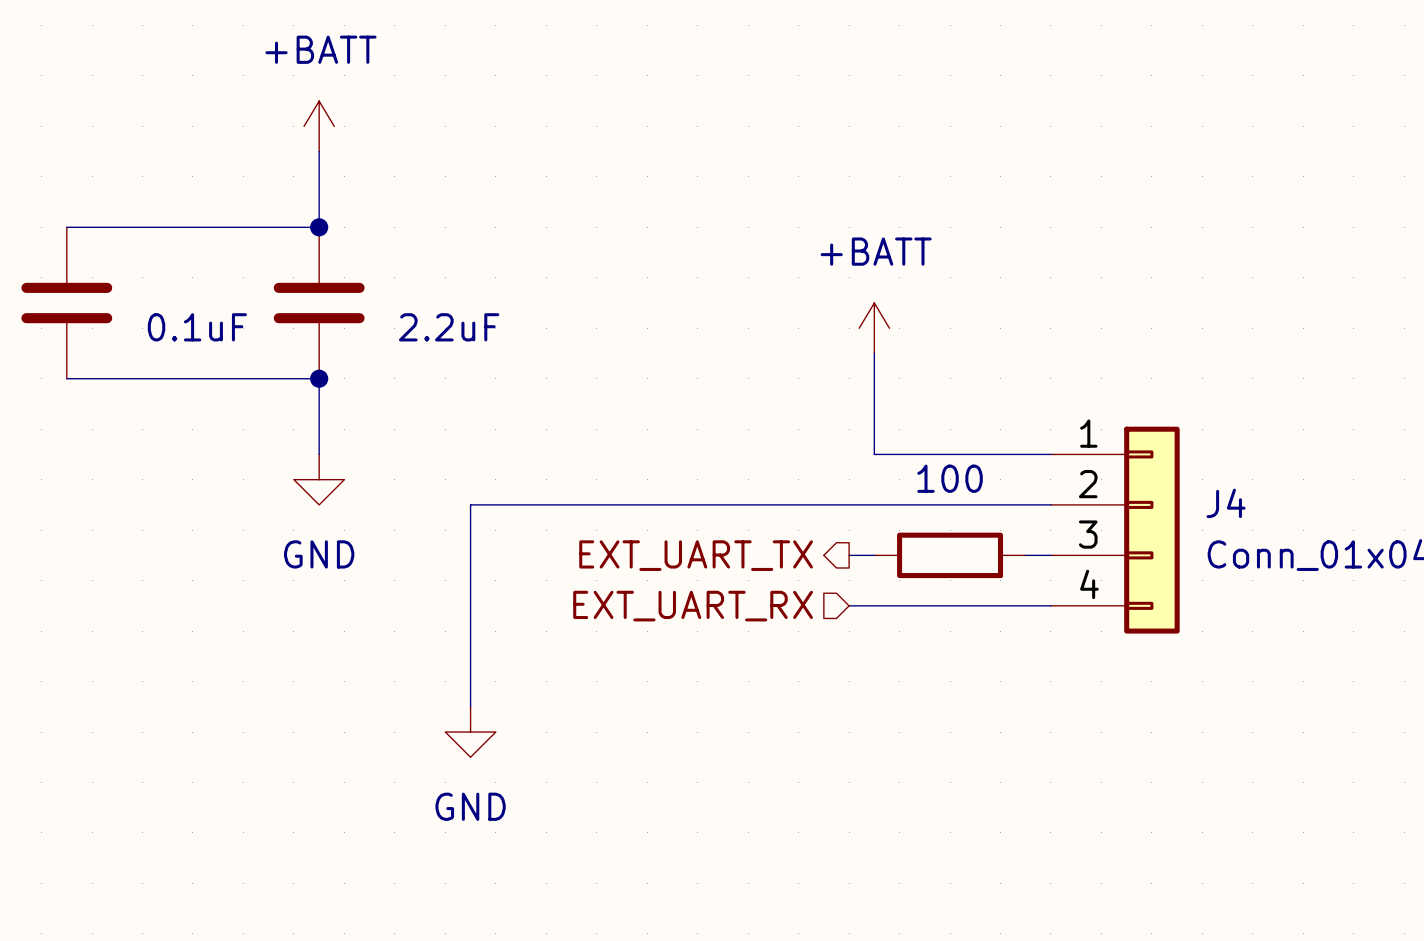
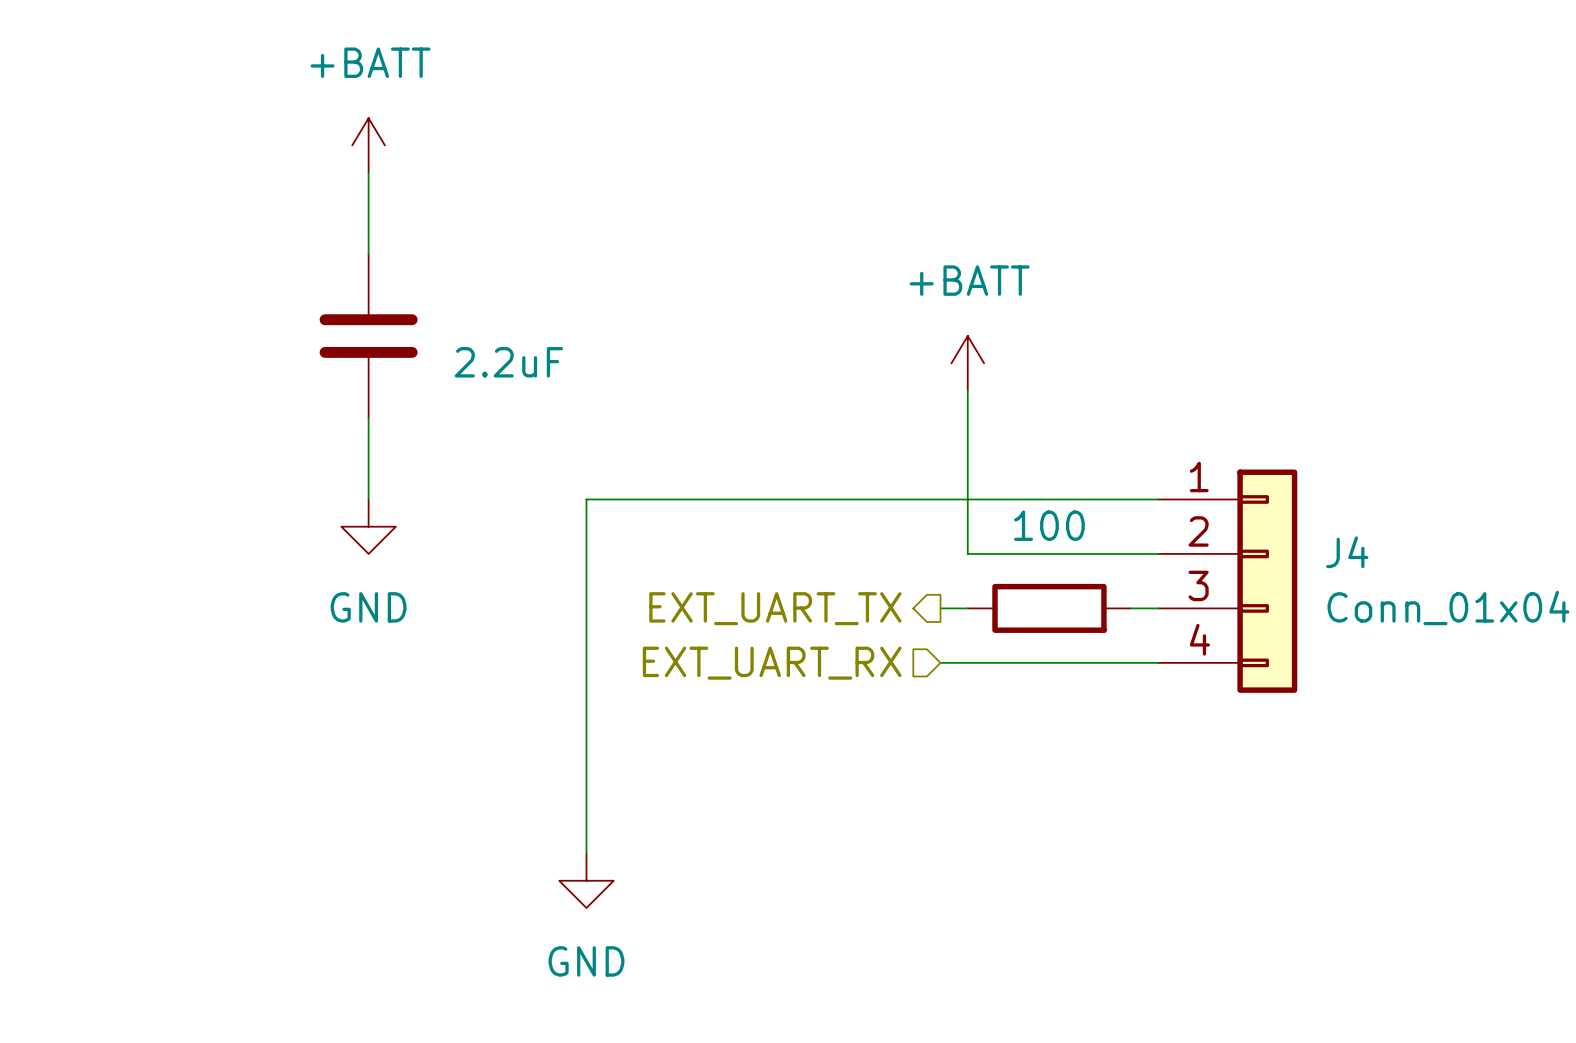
wire: (66, 227) (319, 227) -> none
junction: (319, 227) -> none
part: 0.1uF (66, 303) -> none
wire: (66, 378) (319, 378) -> none
junction: (319, 378) -> none
wire: (874, 504) (470, 504) (470, 706) -> (967, 553) (967, 499) (586, 499) (586, 853)
power symbol position: GND (470, 732) -> GND (586, 880)

